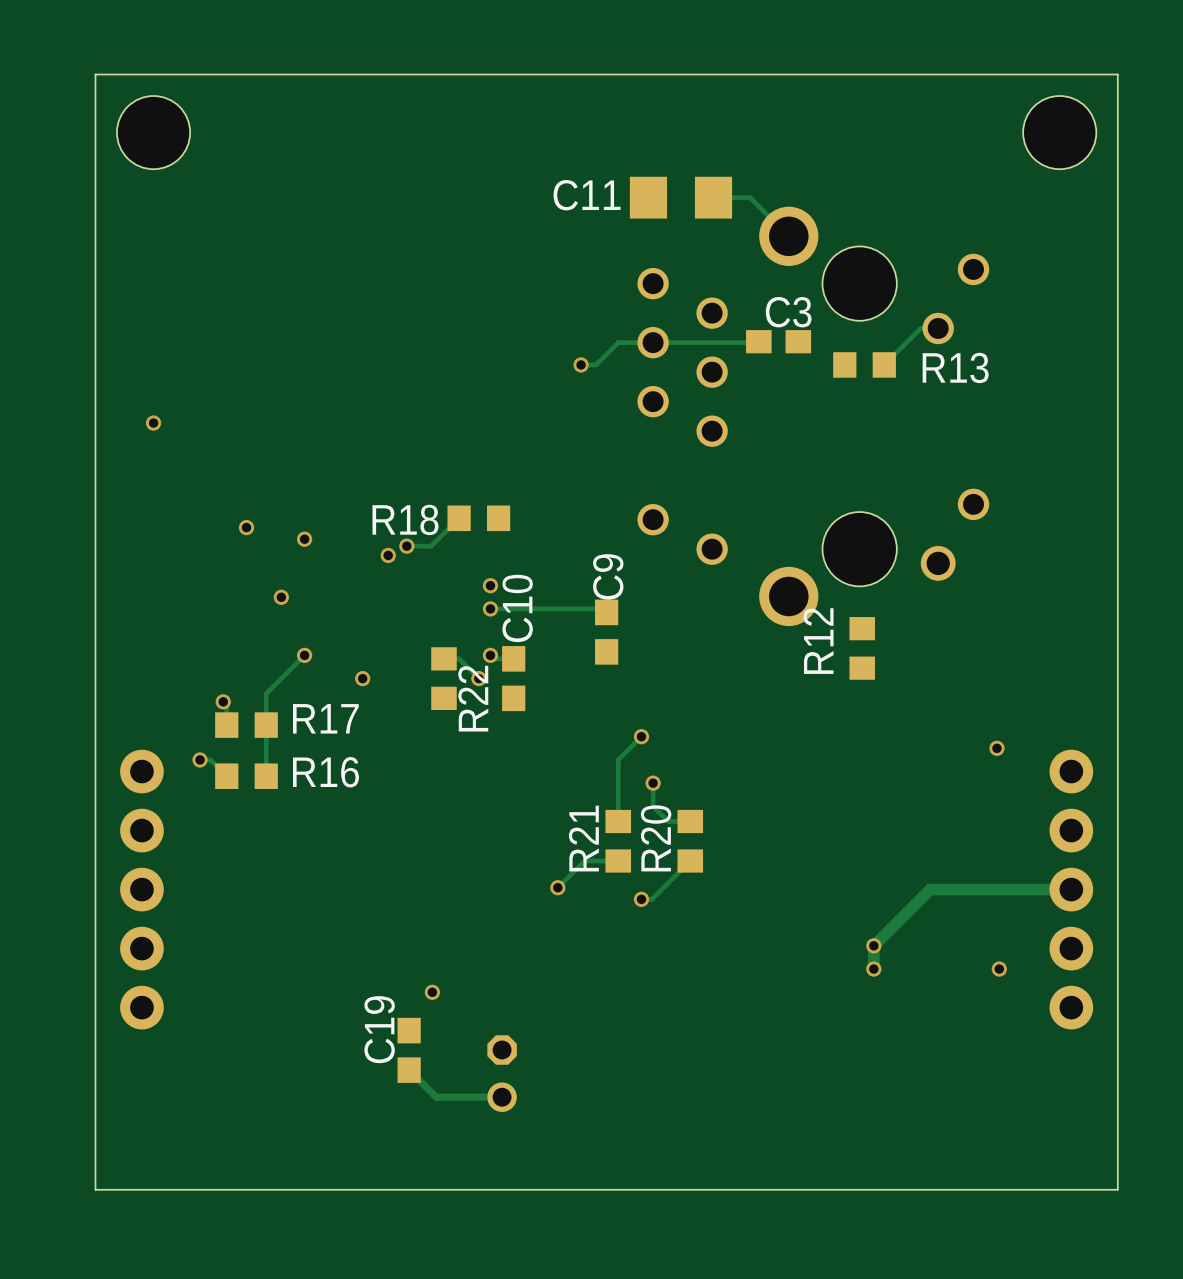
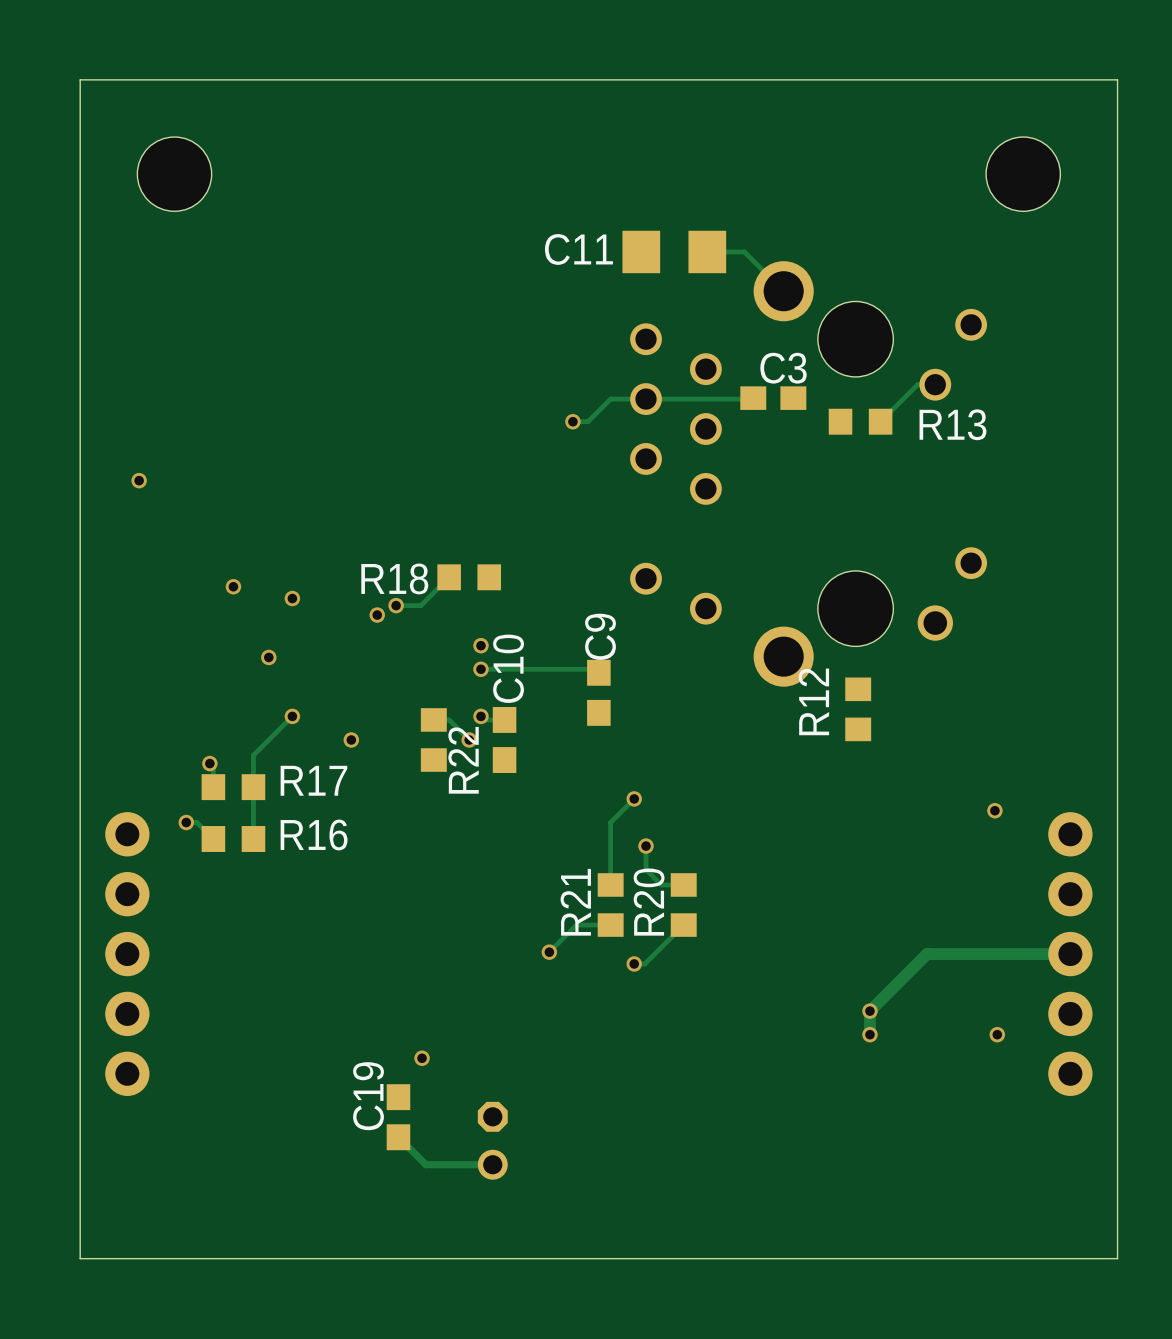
board edge: (1117, 74) (95, 74) -> (1117, 127) (1117, 79) (80, 79) (80, 127)
hole position: (153, 132) -> (174, 174)
hole position: (1059, 132) -> (1023, 174)

